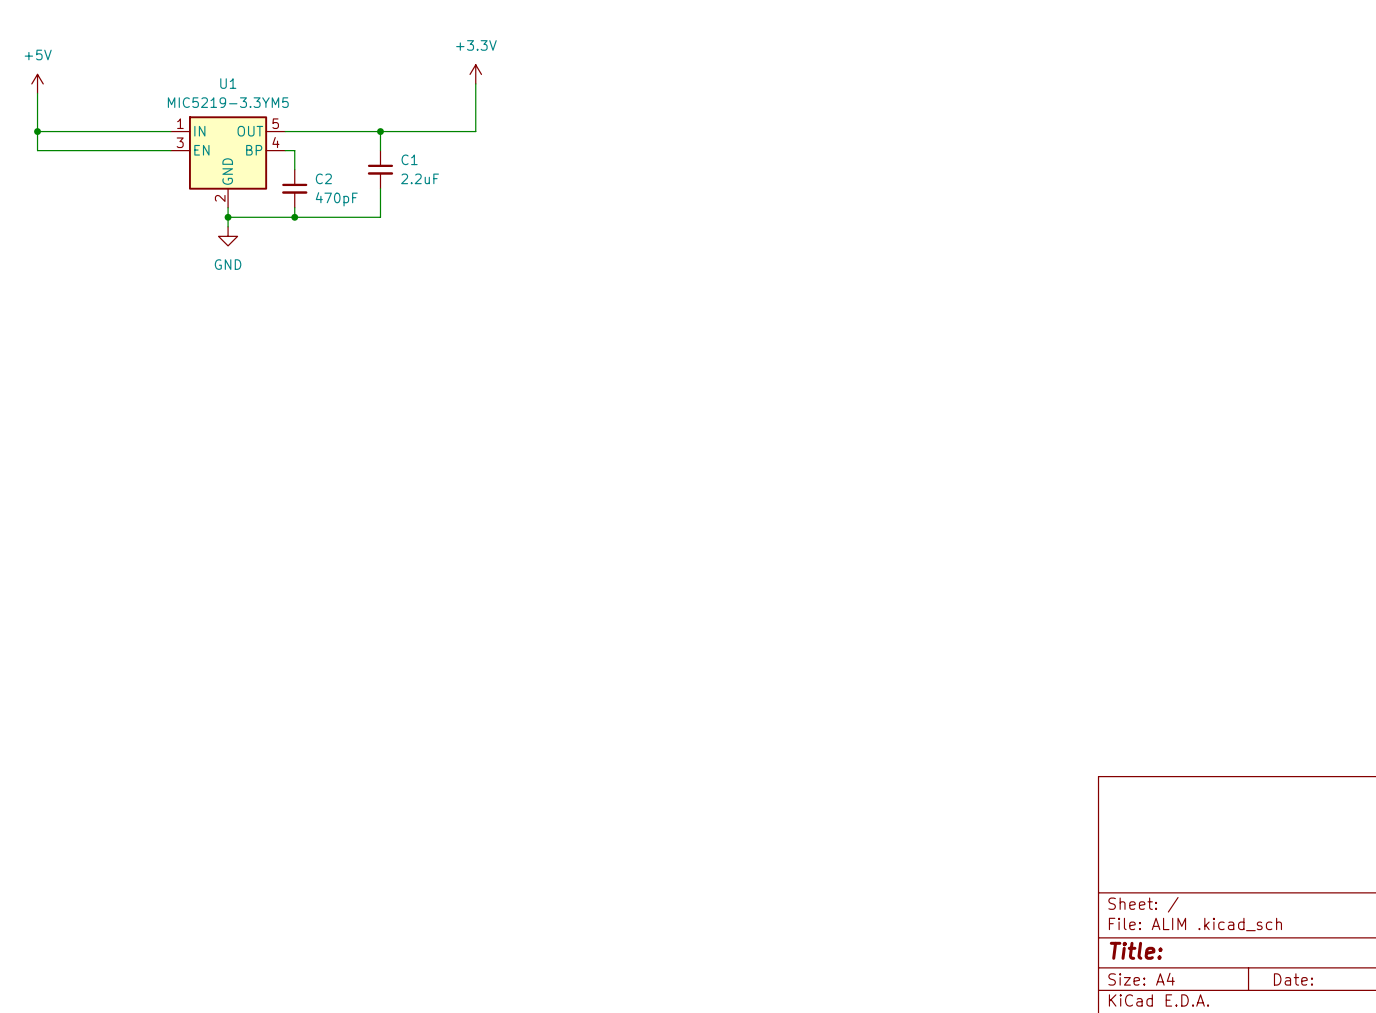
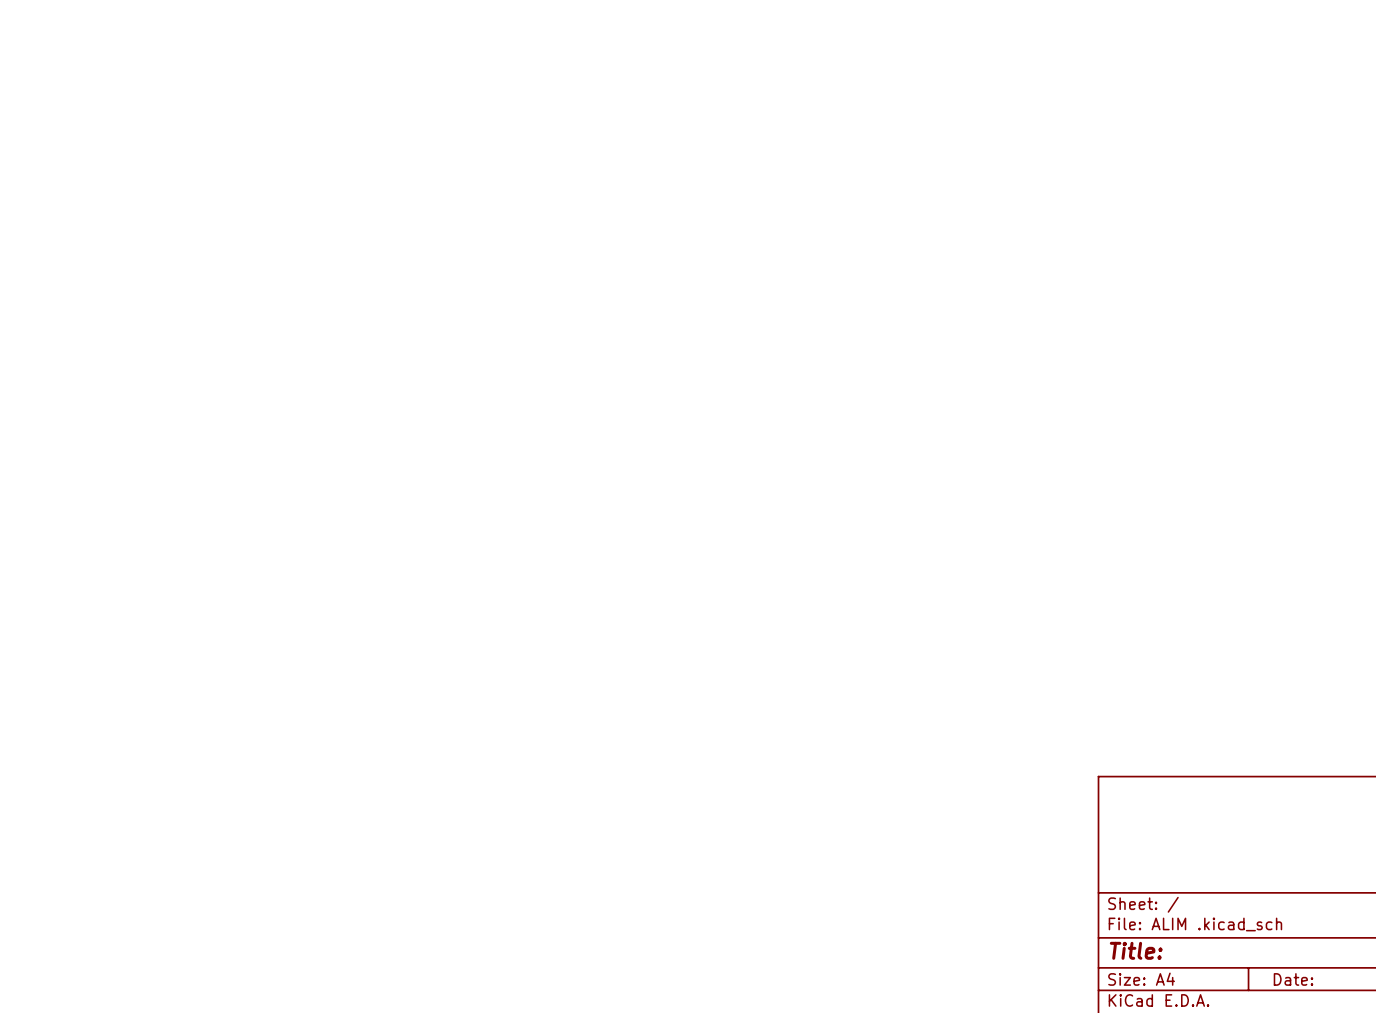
power symbol: +3.3V (475, 74) -> none
power symbol: +5V (37, 83) -> none
wire: (475, 83) (475, 131) (285, 131) -> none
wire: (37, 93) (37, 150) (170, 150) -> none
wire: (37, 131) (170, 131) -> none
junction: (37, 131) -> none
wire: (380, 131) (380, 150) -> none
junction: (380, 131) -> none
wire: (285, 150) (294, 150) (294, 169) -> none
U1: MIC5219-3.3YM5 (228, 162) -> none
C1: 2.2uF (380, 169) -> none
C2: 470pF (294, 188) -> none
wire: (380, 188) (380, 217) (228, 217) -> none
wire: (228, 207) (228, 226) -> none
wire: (294, 207) (294, 217) -> none
junction: (228, 217) -> none
junction: (294, 217) -> none
power symbol: GND (228, 236) -> none

